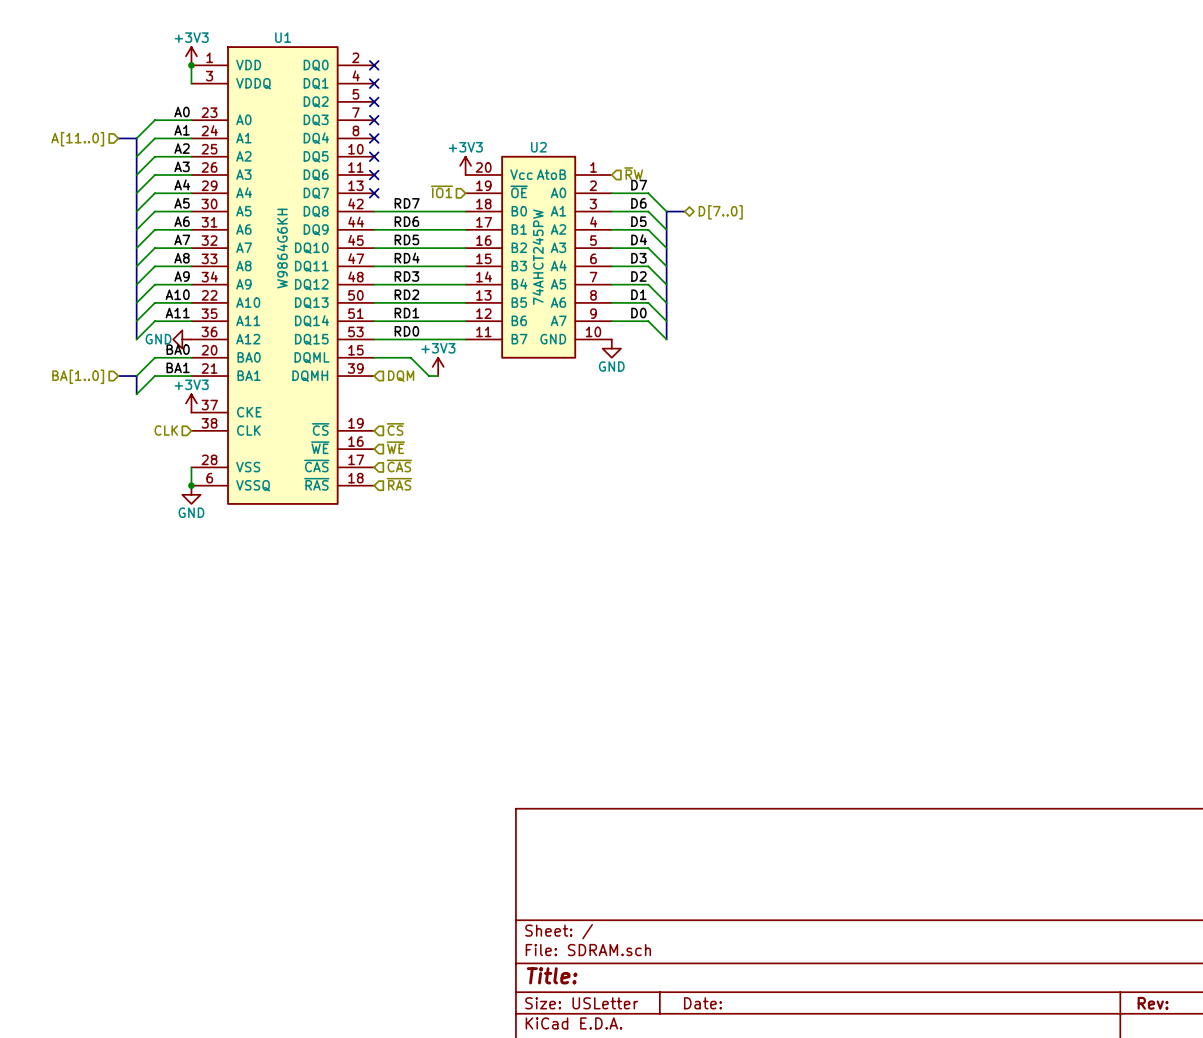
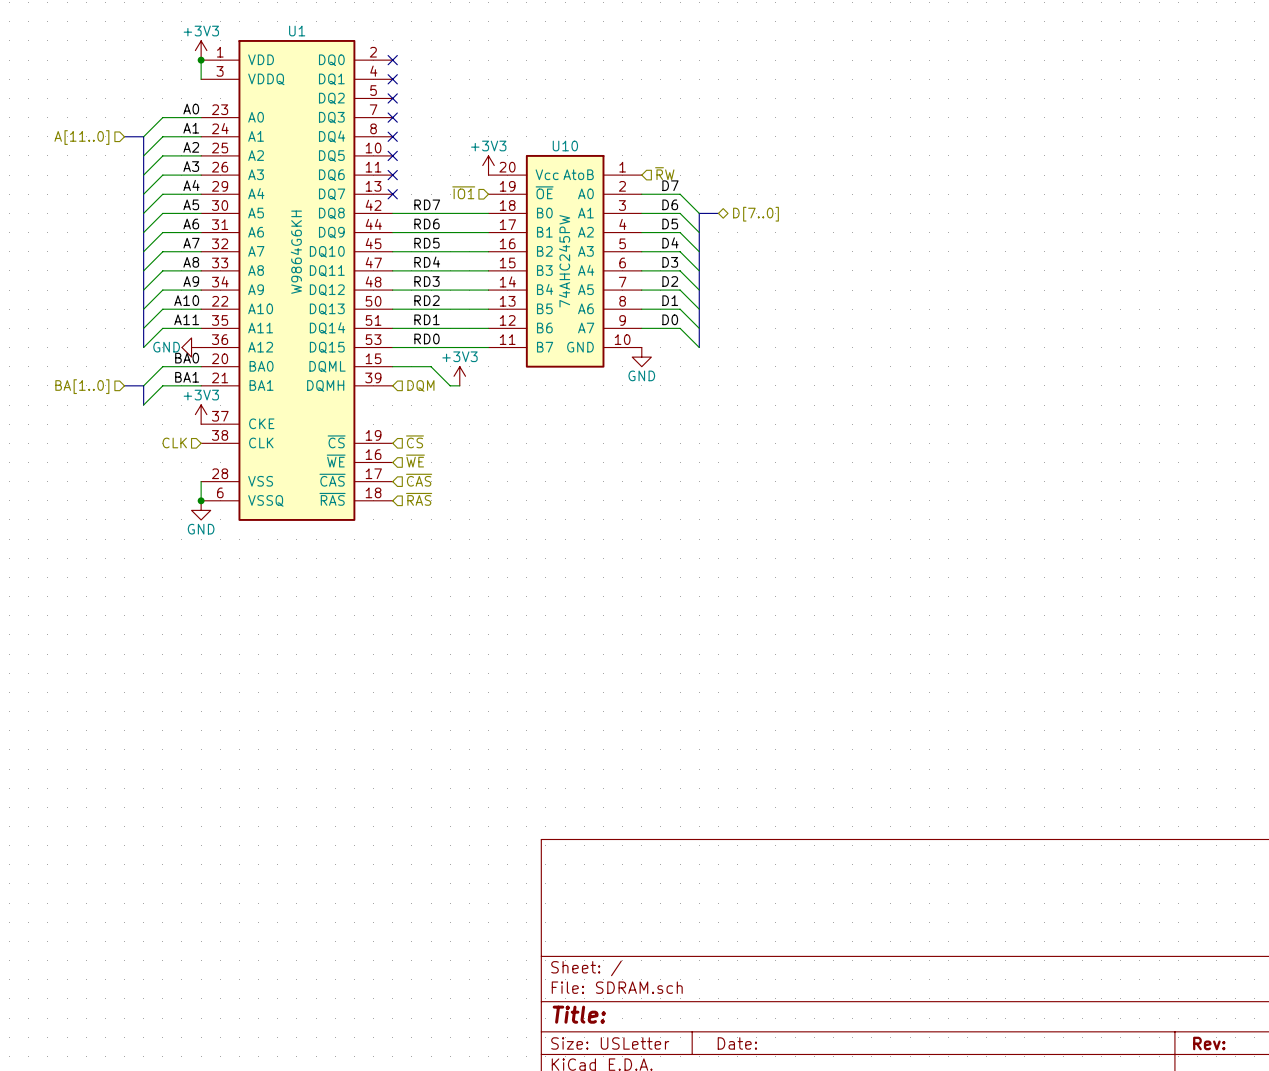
U2 name: U2 (538, 147) -> U10 (565, 145)
U2 value: 74AHCT245PW (538, 257) -> 74AHC245PW (564, 261)

